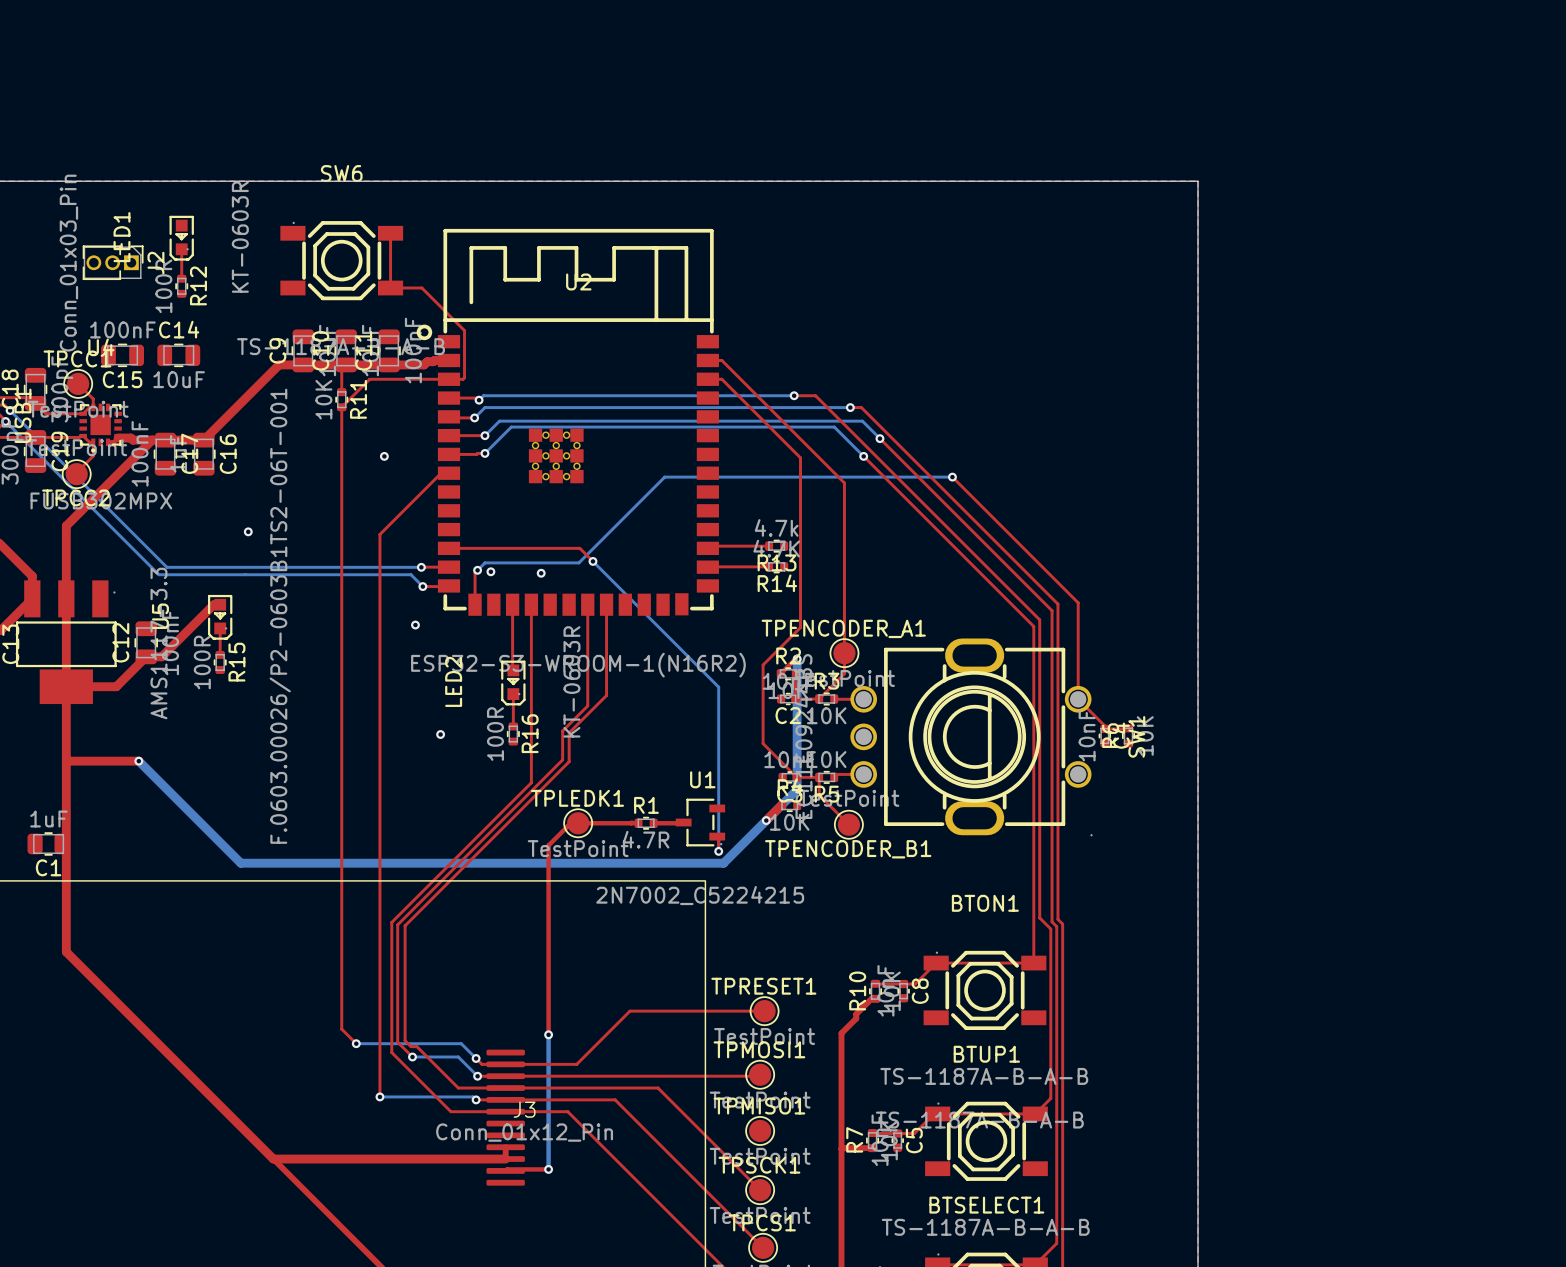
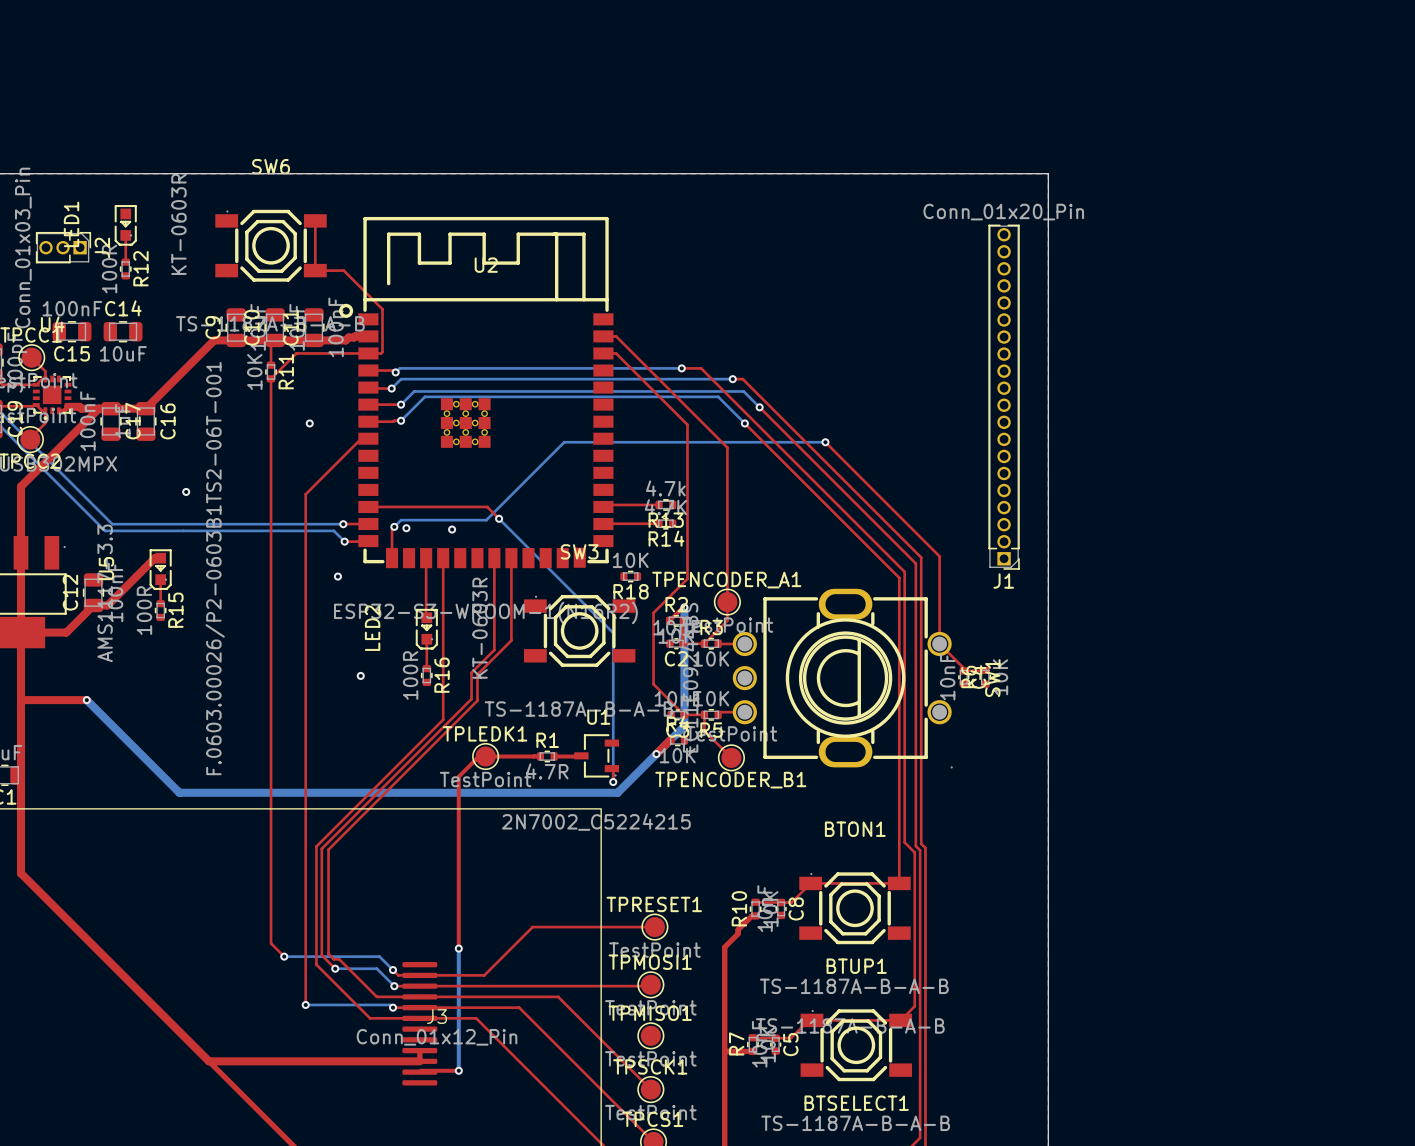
J1: none -> Conn_01x20_Pin (1004, 397)
R18: none -> 10K (630, 576)
SW3: none -> TS-1187A-B-A-B (579, 630)

